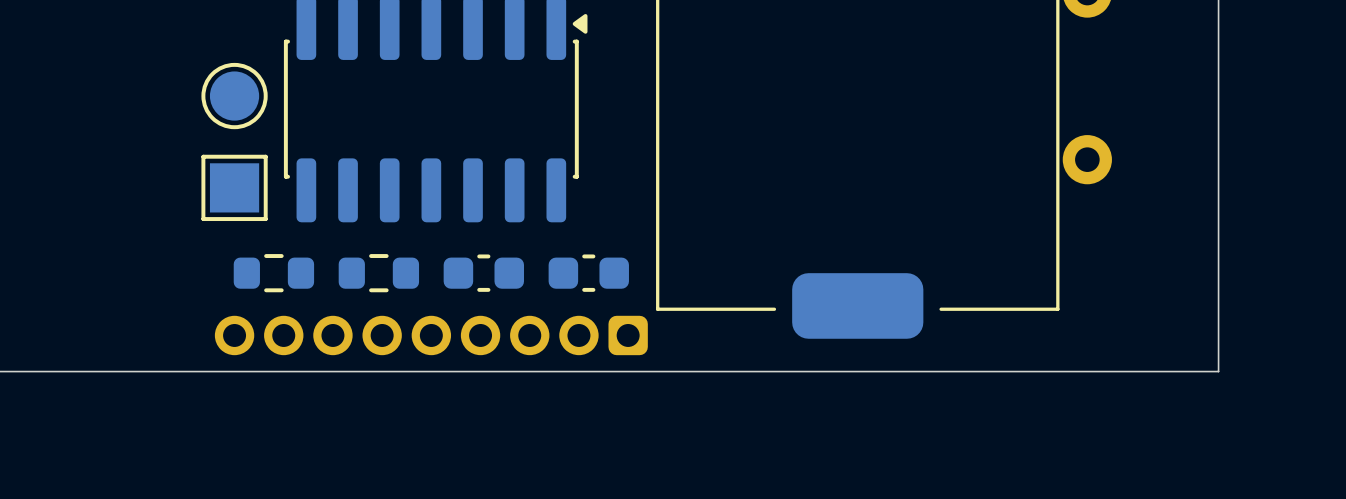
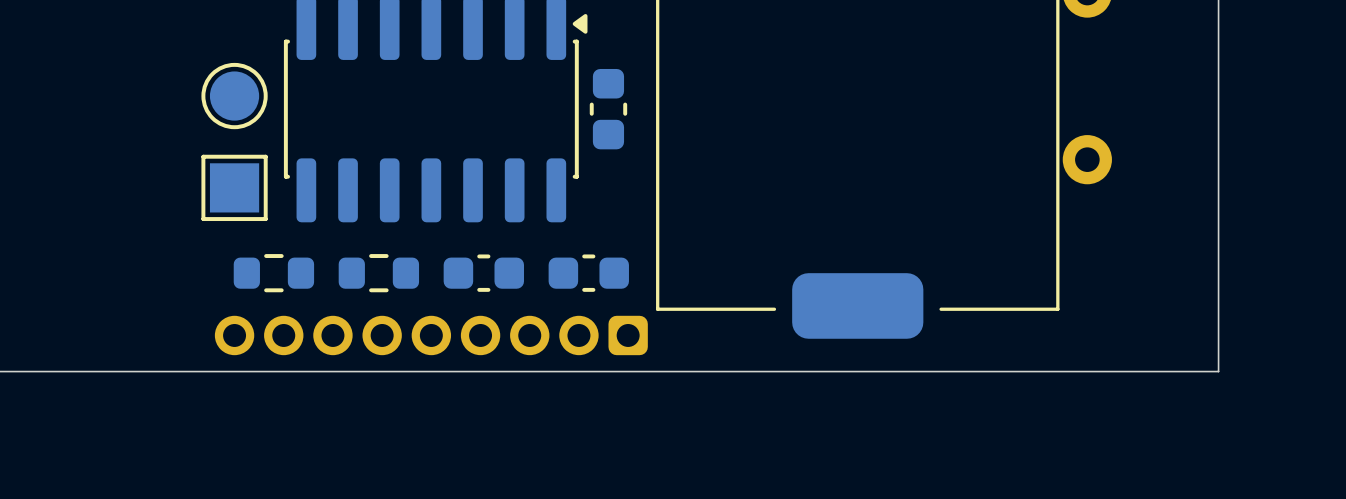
part: none -> (608, 109)

